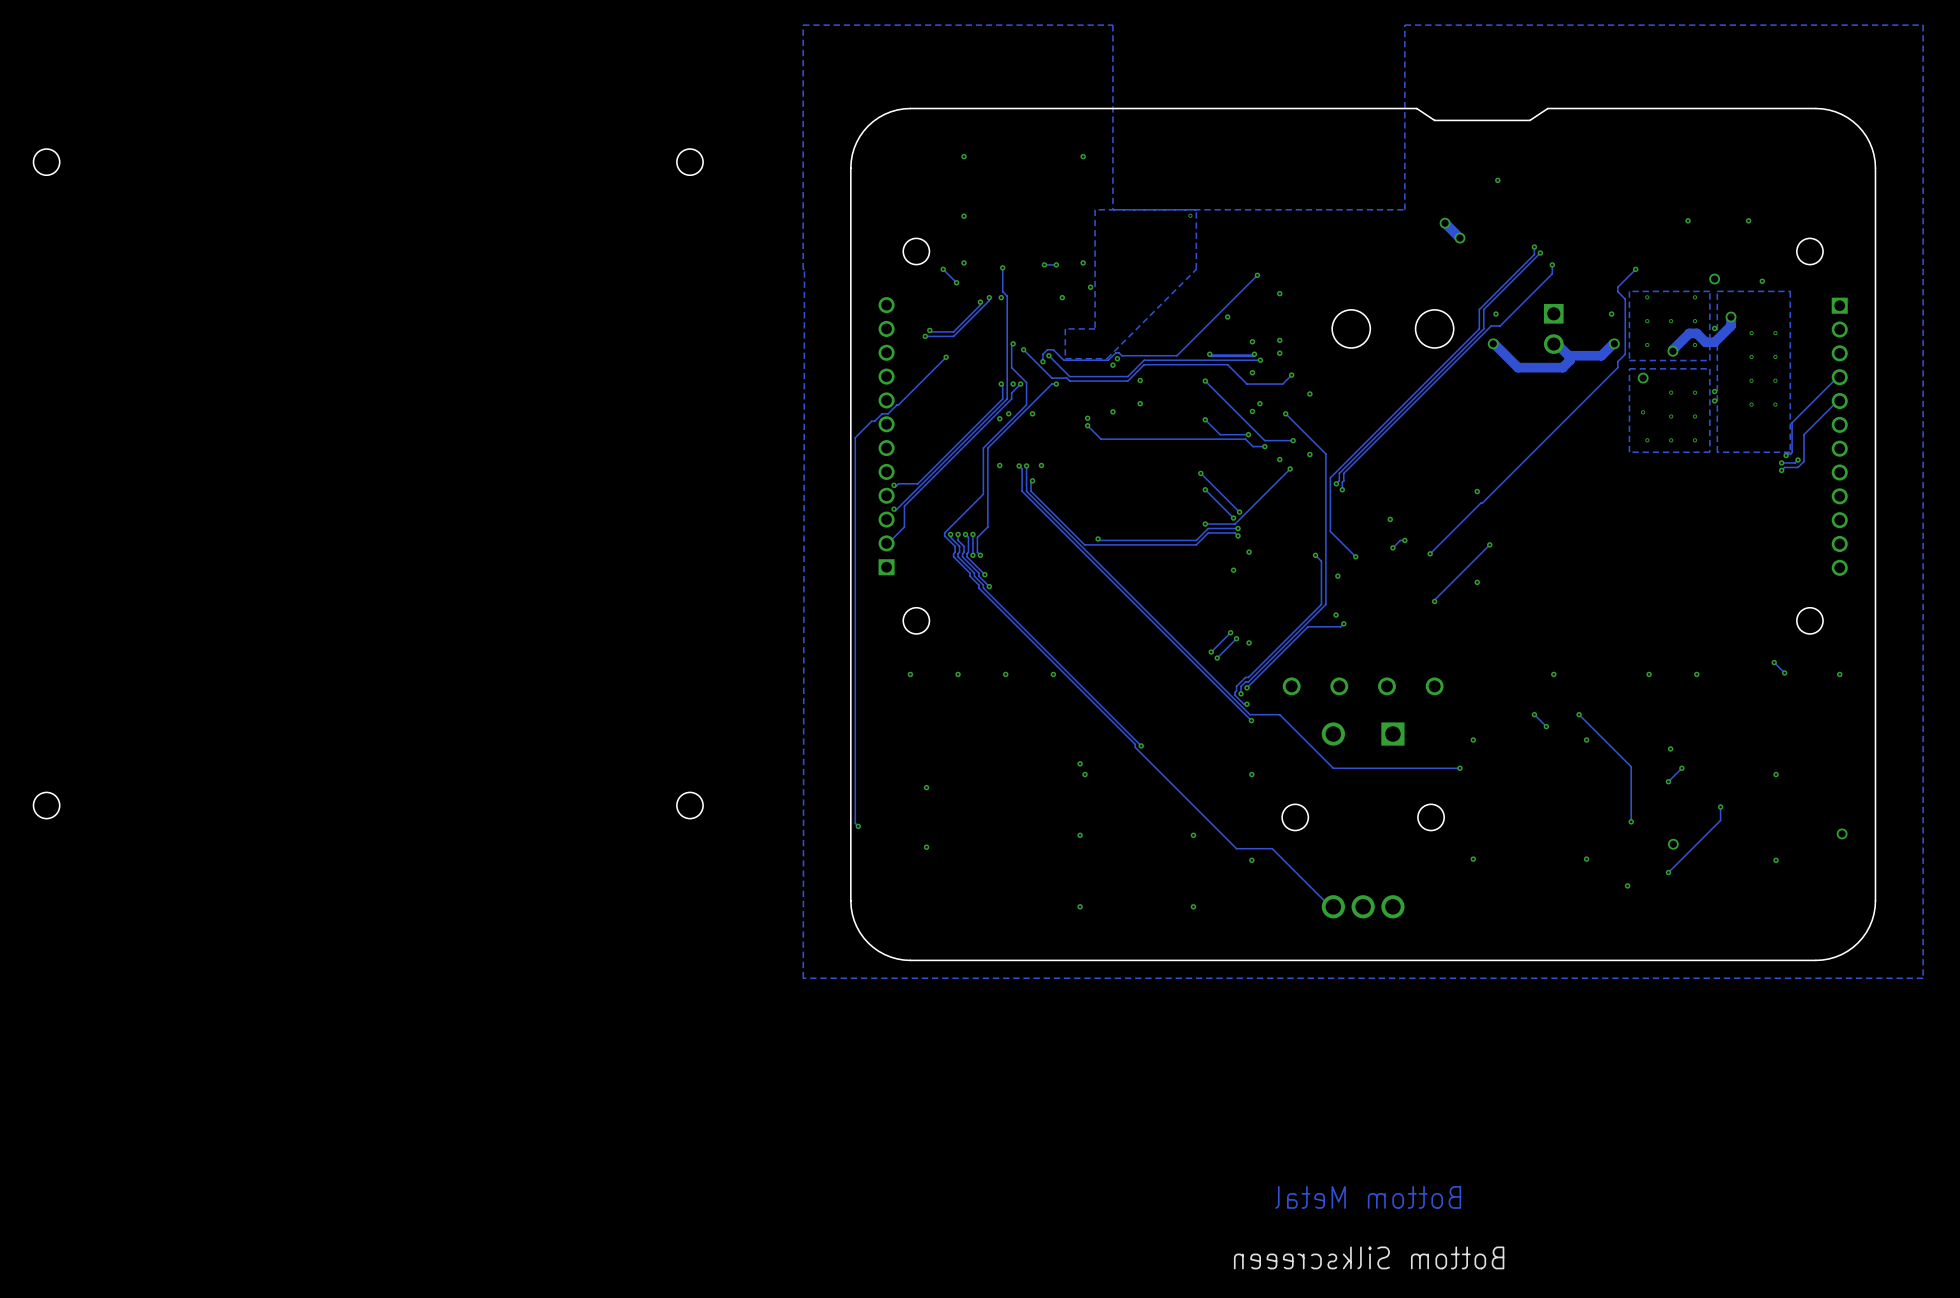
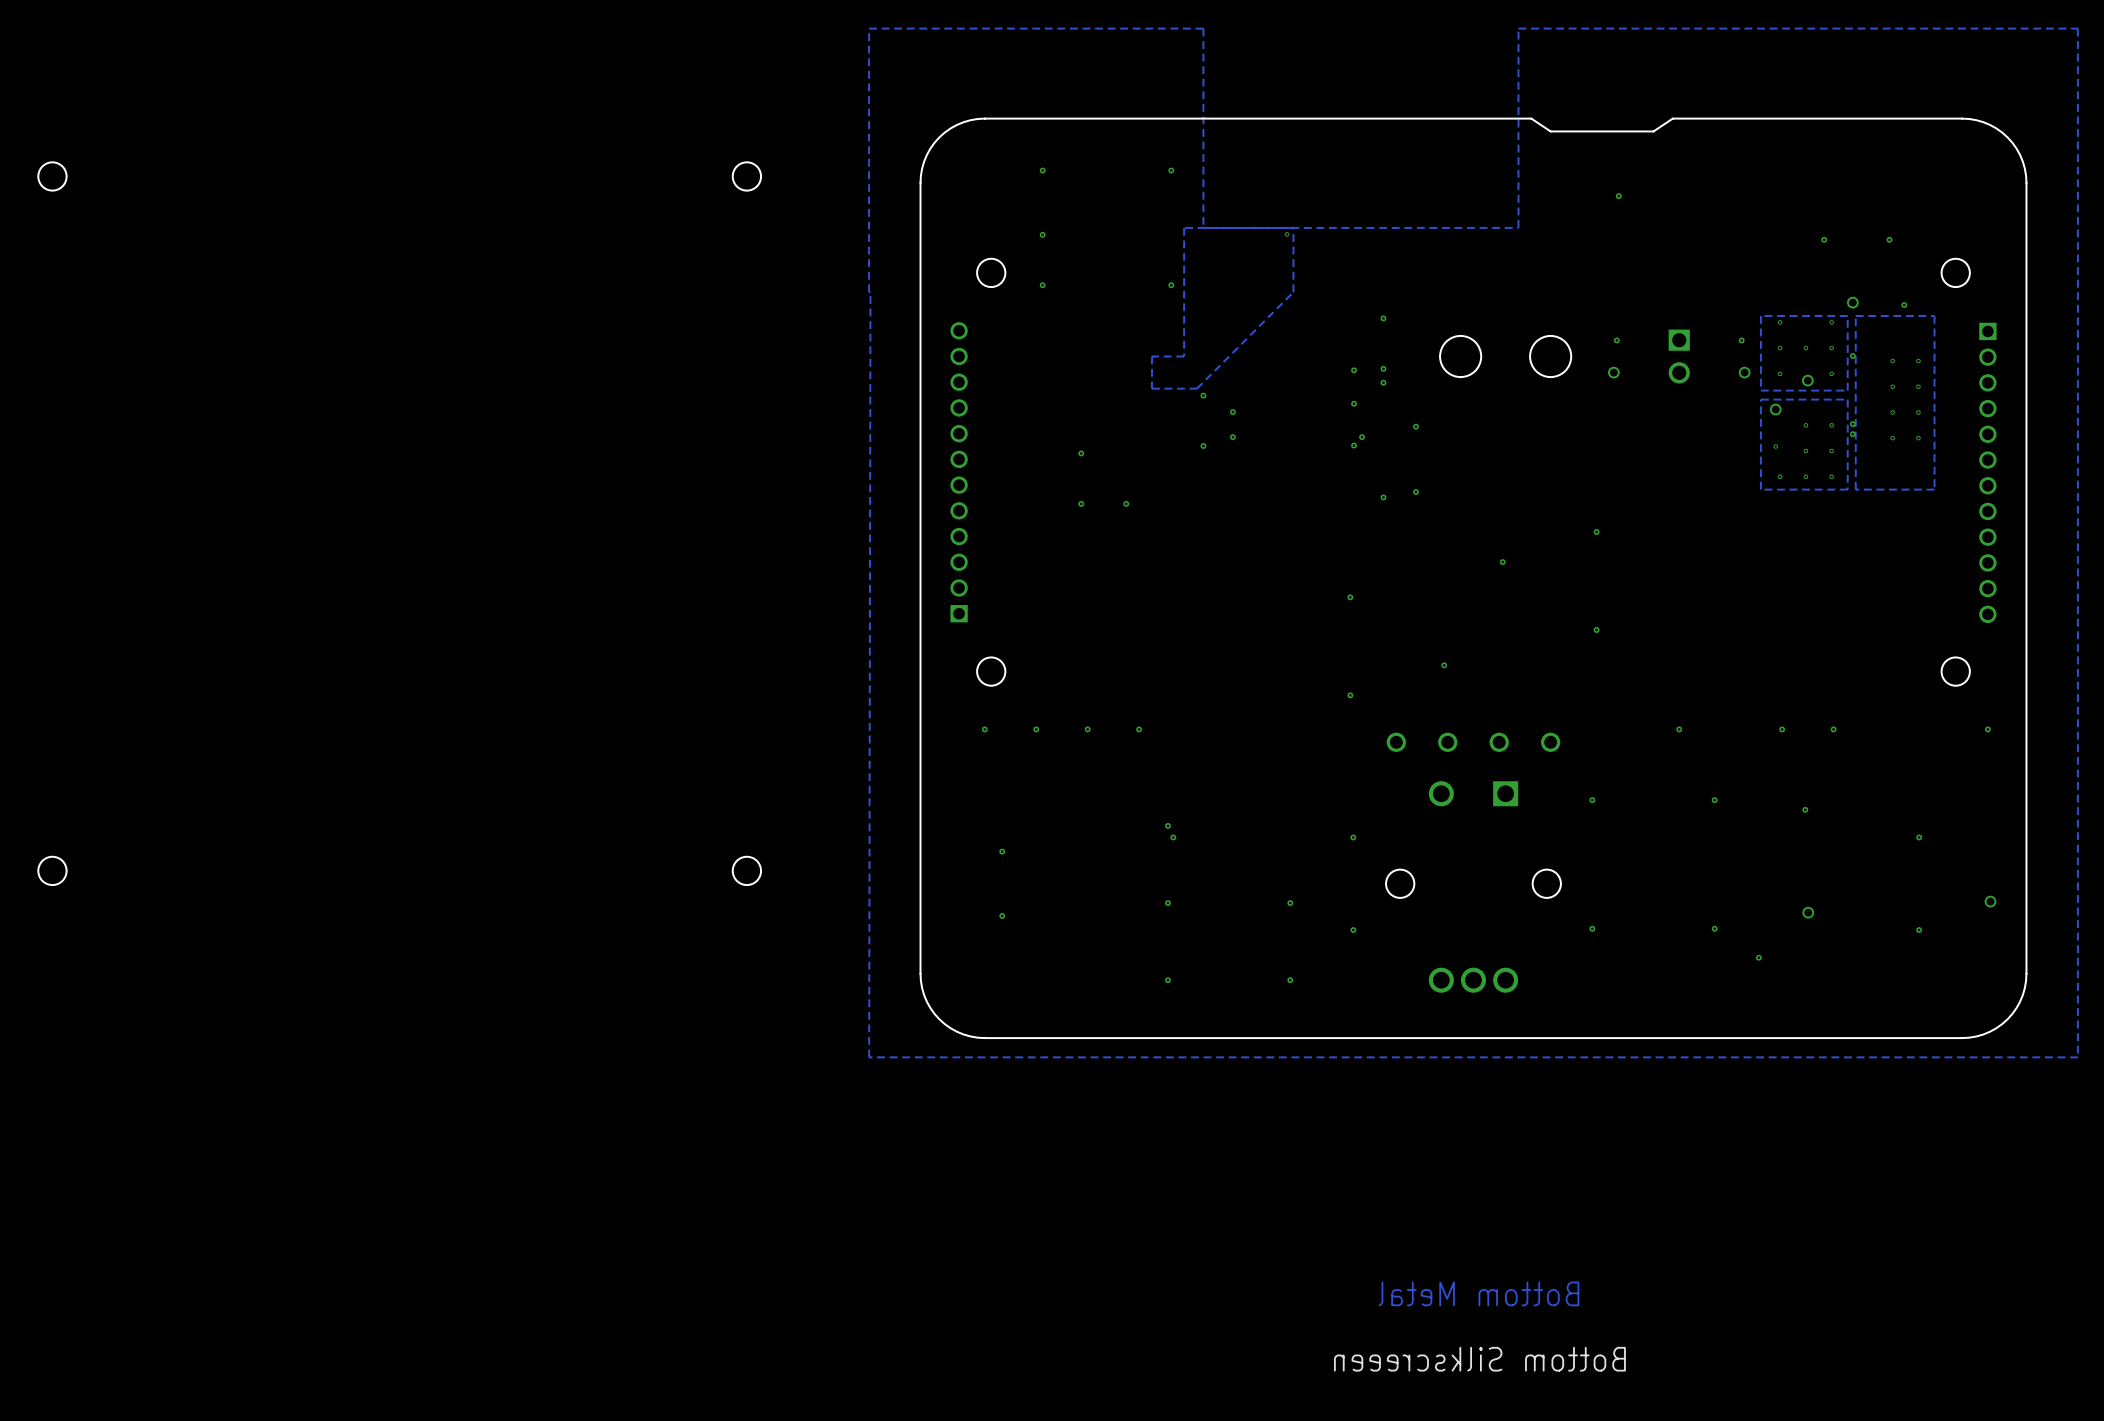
track: (1445, 223) (1459, 238) -> none
via: (1445, 223) -> none
via: (1459, 238) -> none
track: (1534, 247) (1534, 254) (1479, 309) (1479, 328) (1330, 477) (1330, 531) (1355, 556) -> none
via: (1534, 247) -> none
track: (1540, 252) (1483, 309) (1483, 328) (1339, 473) (1339, 480) (1336, 483) -> none
via: (1540, 252) -> none
via: (1044, 264) -> none
track: (1056, 264) (1044, 264) -> none
via: (1056, 264) -> none
track: (1552, 264) (1552, 273) (1500, 325) (1491, 325) (1343, 473) (1342, 489) -> none
via: (1552, 264) -> none
track: (1002, 267) (1002, 291) (1007, 296) (1007, 398) (895, 510) (894, 509) -> none
via: (1002, 267) -> none
track: (943, 269) (956, 282) -> none
via: (943, 269) -> none
track: (1635, 269) (1617, 287) (1617, 291) (1625, 299) (1625, 354) (1617, 361) (1617, 367) (1430, 553) -> none
via: (1635, 269) -> none
track: (1257, 275) (1176, 355) (1121, 355) (1115, 352) (1108, 360) (1063, 360) (1053, 349) (1047, 349) (1042, 354) (1042, 361) -> none
via: (1257, 275) -> none
via: (956, 282) -> none
via: (1090, 287) -> none
track: (989, 297) (989, 300) (953, 336) (925, 336) -> none
via: (989, 297) -> none
via: (1001, 297) -> none
via: (1062, 297) -> none
track: (980, 302) (980, 305) (953, 331) (929, 330) -> none
via: (980, 302) -> none
via: (1227, 317) -> none
track: (1731, 317) (1731, 325) (1714, 342) (1705, 342) (1696, 333) (1689, 333) (1672, 351) -> none
via: (1731, 317) -> none
via: (929, 330) -> none
via: (925, 336) -> none
track: (1013, 343) (1011, 367) (1026, 382) (1026, 404) (983, 448) (983, 494) (944, 532) (944, 535) (955, 546) (953, 556) (969, 573) (969, 576) (978, 585) (978, 588) (1236, 848) (1272, 848) (1330, 906) (1333, 906) -> none
via: (1013, 343) -> none
track: (1493, 343) (1518, 367) (1562, 367) (1570, 360) (1570, 355) -> none
track: (1614, 343) (1601, 355) (1568, 355) (1558, 345) (1553, 344) -> none
track: (1023, 349) (1051, 378) (1066, 378) (1069, 381) (1127, 381) (1144, 364) (1227, 364) (1246, 384) (1282, 384) (1291, 375) -> none
via: (1023, 349) -> none
via: (1209, 354) -> none
track: (1254, 354) (1209, 354) -> none
via: (1254, 354) -> none
track: (1048, 355) (1069, 376) (1127, 376) (1144, 360) (1260, 360) -> none
via: (1048, 355) -> none
track: (946, 357) (898, 404) (888, 413) (882, 413) (874, 421) (871, 421) (855, 437) (855, 823) (858, 826) -> none
via: (946, 357) -> none
via: (1117, 358) -> none
via: (1260, 360) -> none
via: (1042, 361) -> none
via: (1291, 375) -> none
track: (1839, 377) (1792, 422) (1792, 452) (1786, 455) -> none
track: (1205, 381) (1264, 440) (1293, 440) -> none
via: (1205, 381) -> none
track: (1001, 384) (1002, 398) (917, 483) (898, 483) (895, 486) (894, 485) -> none
via: (1001, 384) -> none
via: (1013, 384) -> none
track: (1020, 384) (1011, 392) (1011, 398) (904, 506) (904, 527) (886, 543) -> none
via: (1020, 384) -> none
track: (1056, 384) (1051, 384) (987, 448) (987, 527) (977, 537) (977, 552) (980, 555) -> none
via: (1056, 384) -> none
track: (1839, 401) (1803, 434) (1803, 461) (1798, 467) (1784, 467) (1781, 470) -> none
via: (1008, 413) -> none
via: (1032, 413) -> none
track: (1285, 413) (1325, 454) (1325, 604) (1248, 681) (1245, 681) (1241, 686) (1241, 693) -> none
via: (1285, 413) -> none
via: (1087, 418) -> none
track: (1205, 419) (1220, 434) (1248, 434) -> none
via: (1205, 419) -> none
track: (1087, 425) (1101, 439) (1245, 439) (1252, 446) (1264, 446) -> none
via: (1087, 425) -> none
via: (1248, 434) -> none
via: (1293, 440) -> none
via: (1264, 446) -> none
via: (1786, 455) -> none
track: (1798, 459) (1795, 462) (1781, 462) -> none
via: (1798, 459) -> none
via: (1781, 462) -> none
track: (1019, 465) (1022, 468) (1022, 491) (1251, 720) -> none
via: (1019, 465) -> none
track: (1026, 465) (1026, 491) (1249, 714) (1279, 714) (1333, 768) (1459, 768) -> none
via: (1026, 465) -> none
track: (1290, 468) (1235, 524) (1205, 524) -> none
via: (1290, 468) -> none
via: (1781, 470) -> none
track: (1200, 473) (1239, 512) -> none
via: (1200, 473) -> none
track: (1032, 480) (1031, 491) (1084, 544) (1196, 544) (1208, 532) (1235, 532) (1238, 535) -> none
via: (1032, 480) -> none
via: (1336, 483) -> none
via: (894, 485) -> none
track: (1205, 489) (1233, 518) -> none
via: (1205, 489) -> none
via: (1342, 489) -> none
via: (894, 509) -> none
via: (1239, 512) -> none
via: (1233, 518) -> none
via: (1205, 524) -> none
track: (1238, 528) (1208, 528) (1196, 540) (1098, 538) -> none
via: (1238, 528) -> none
track: (950, 534) (950, 537) (959, 546) (958, 556) (974, 573) (974, 576) (983, 585) (983, 588) (1141, 745) -> none
via: (950, 534) -> none
track: (958, 534) (958, 540) (964, 546) (962, 556) (989, 586) -> none
via: (958, 534) -> none
track: (965, 534) (968, 537) (966, 556) (984, 574) -> none
via: (965, 534) -> none
track: (972, 534) (972, 555) -> none
via: (972, 534) -> none
via: (1238, 535) -> none
via: (1098, 538) -> none
track: (1404, 540) (1400, 540) (1392, 547) -> none
via: (1404, 540) -> none
track: (1489, 544) (1434, 601) -> none
via: (1489, 544) -> none
via: (1392, 547) -> none
via: (1430, 553) -> none
via: (972, 555) -> none
via: (980, 555) -> none
track: (1315, 555) (1321, 561) (1321, 604) (1248, 677) (1245, 677) (1236, 686) (1235, 695) (1244, 704) (1246, 704) -> none
via: (1315, 555) -> none
via: (1355, 556) -> none
via: (1233, 570) -> none
via: (984, 574) -> none
via: (1337, 576) -> none
via: (989, 586) -> none
via: (1434, 601) -> none
track: (1343, 623) (1340, 626) (1308, 626) (1246, 687) -> none
via: (1343, 623) -> none
track: (1230, 632) (1211, 652) -> none
via: (1230, 632) -> none
track: (1236, 638) (1217, 658) -> none
via: (1236, 638) -> none
via: (1211, 652) -> none
via: (1217, 658) -> none
track: (1774, 662) (1784, 672) -> none
via: (1774, 662) -> none
via: (1784, 672) -> none
via: (1246, 687) -> none
via: (1241, 693) -> none
via: (1246, 704) -> none
track: (1534, 714) (1546, 726) -> none
via: (1534, 714) -> none
track: (1579, 714) (1631, 766) (1631, 821) -> none
via: (1579, 714) -> none
via: (1251, 720) -> none
via: (1546, 726) -> none
via: (1141, 745) -> none
via: (1459, 768) -> none
track: (1681, 768) (1668, 781) -> none
via: (1681, 768) -> none
via: (1668, 781) -> none
track: (1720, 807) (1720, 820) (1668, 872) -> none
via: (1720, 807) -> none
via: (1631, 821) -> none
via: (858, 826) -> none
via: (1668, 872) -> none

